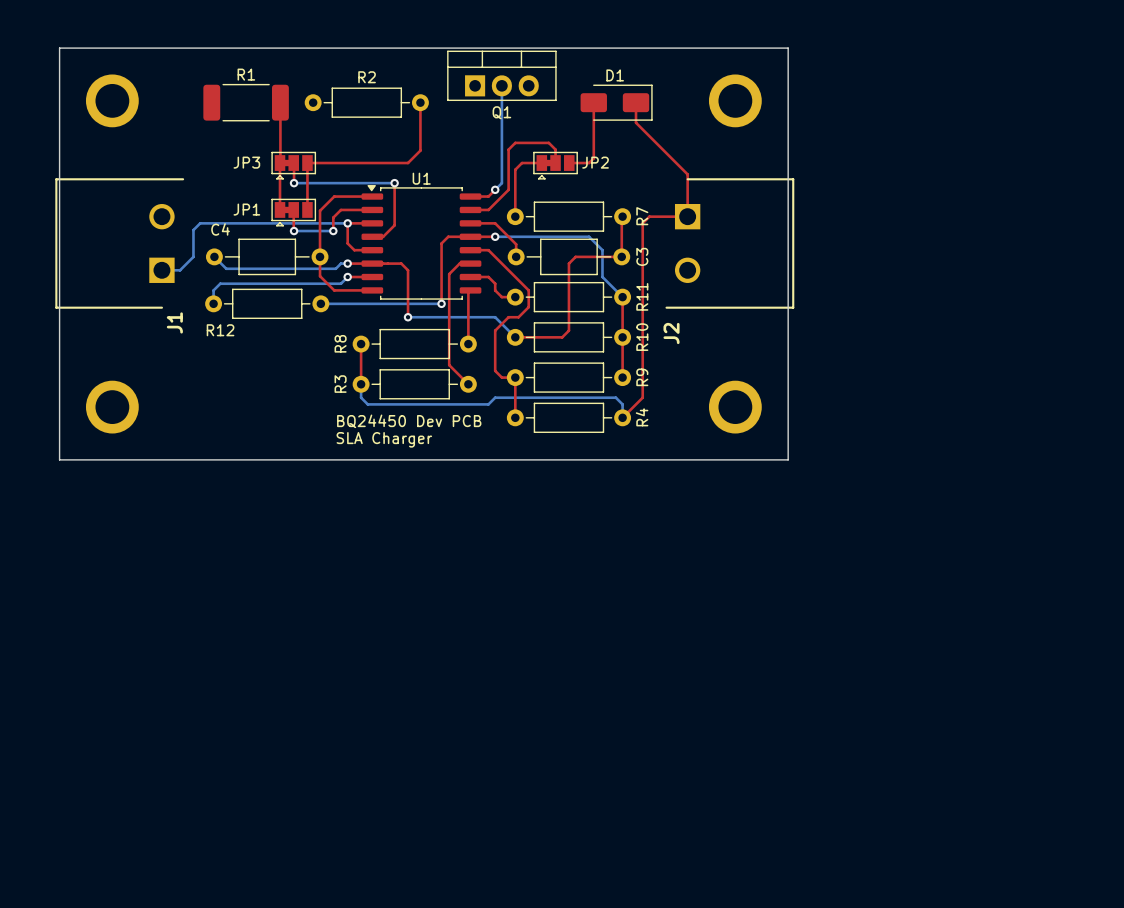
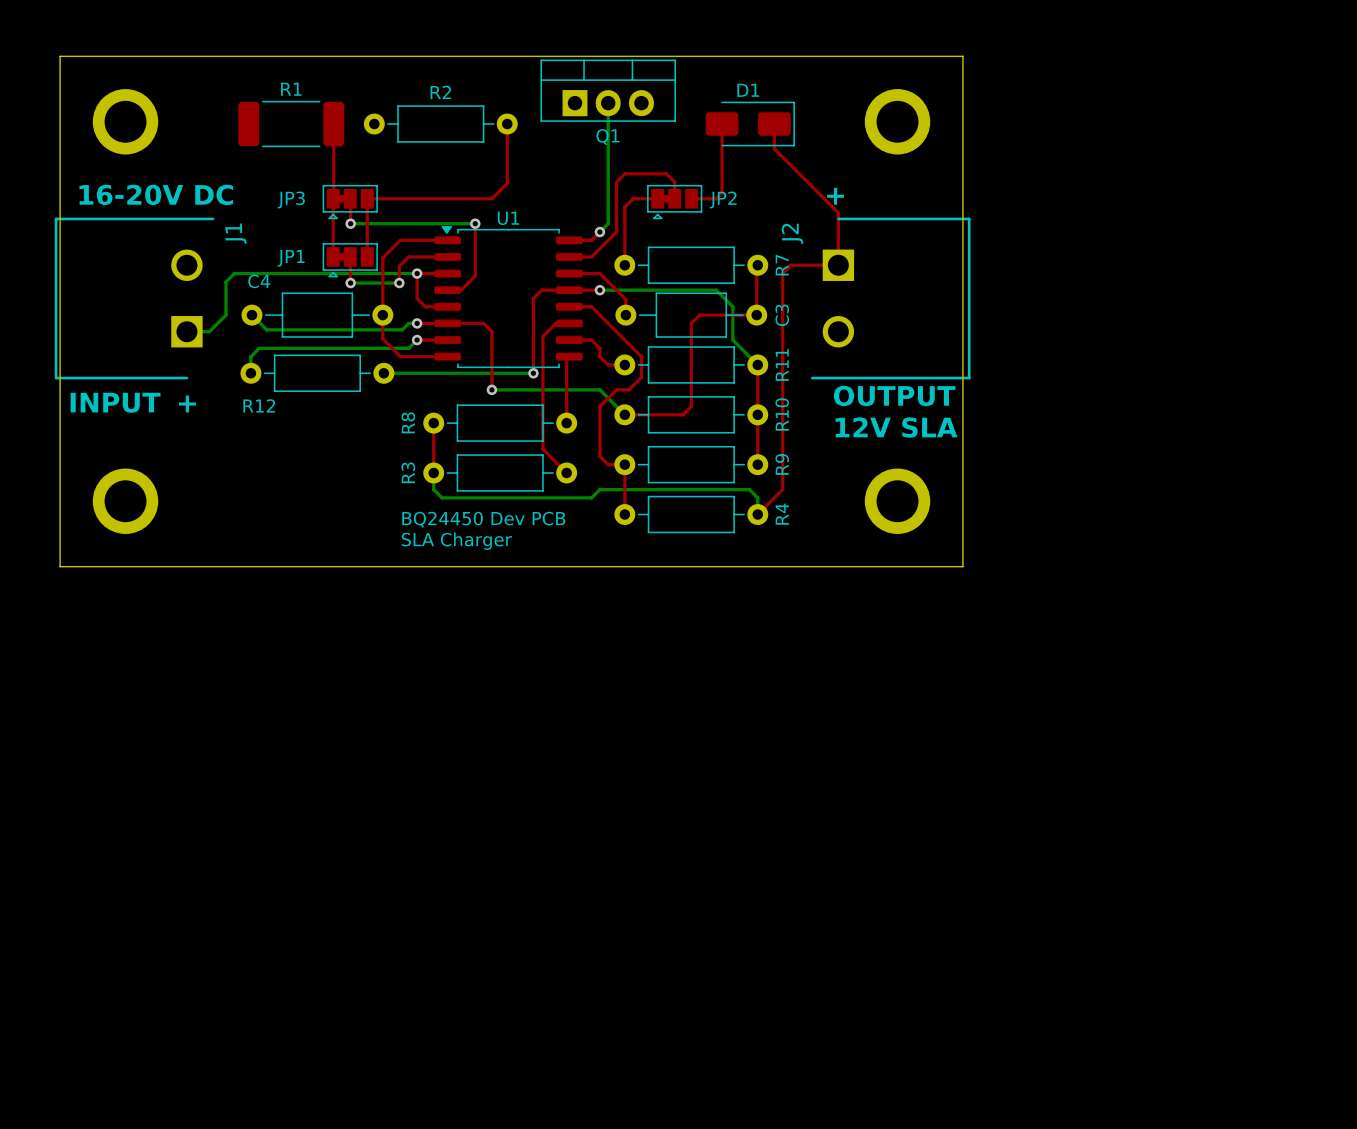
text: none -> 16-20V DC (156, 194)
text: none -> + (835, 196)
J1 name position: J1 (174, 322) -> J1 (235, 233)
text: none -> OUTPUT (894, 395)
text: none -> INPUT (115, 402)
text: none -> + (187, 403)
J2 name position: J2 (671, 333) -> J2 (792, 233)
text: none -> 12V SLA (896, 427)

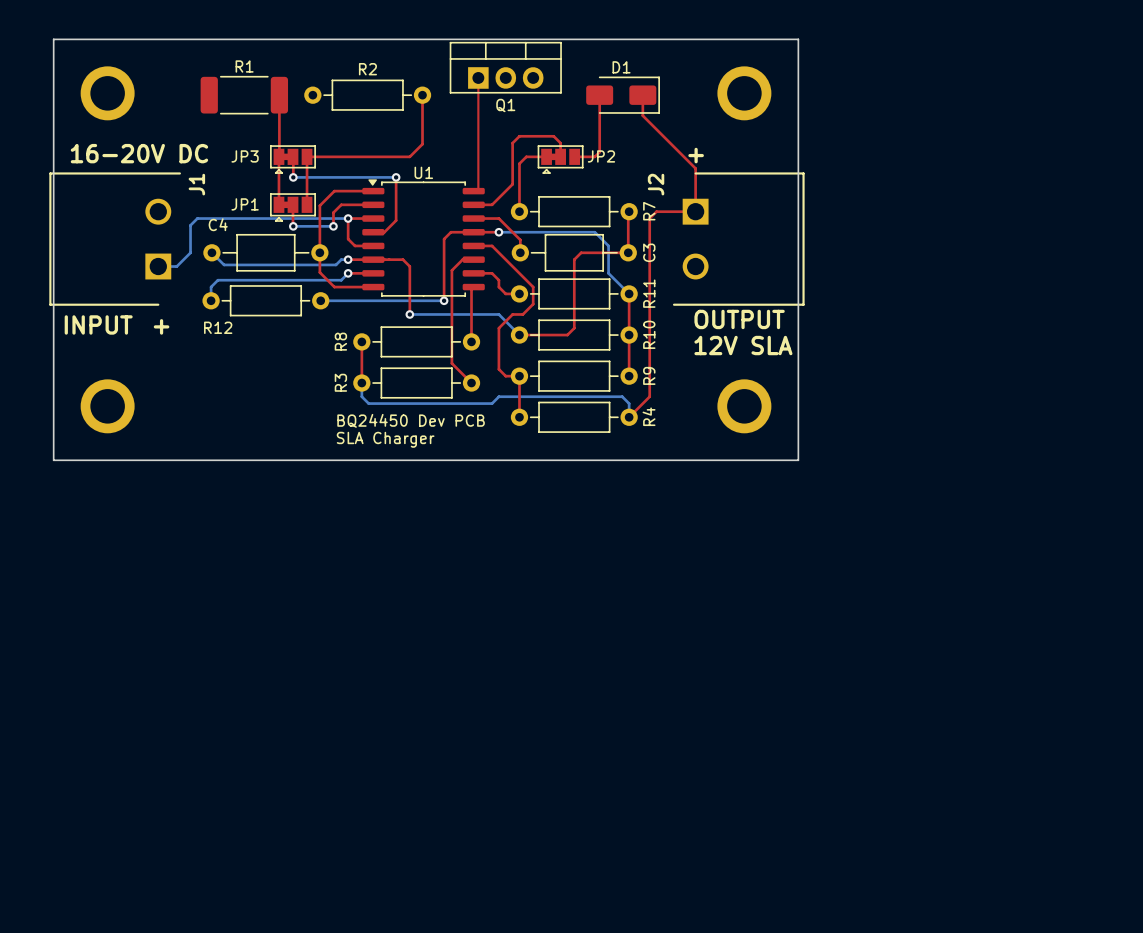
bottom track: (608, 103) (608, 223) (599, 232) -> none
top track: (599, 232) (591, 240) (574, 240) -> (478, 77) (478, 191)
via: (599, 232) -> none

